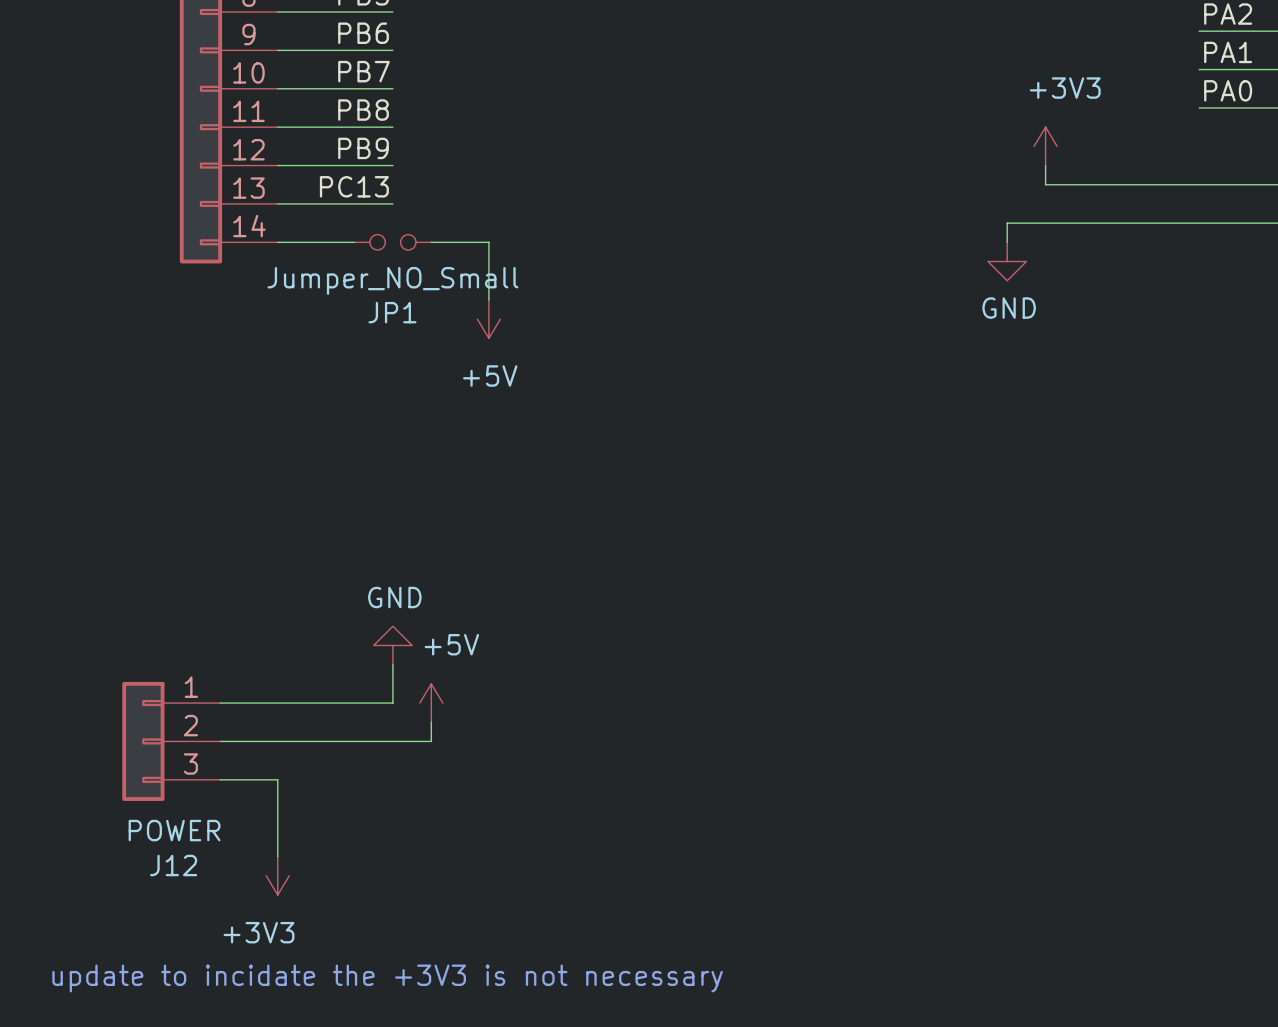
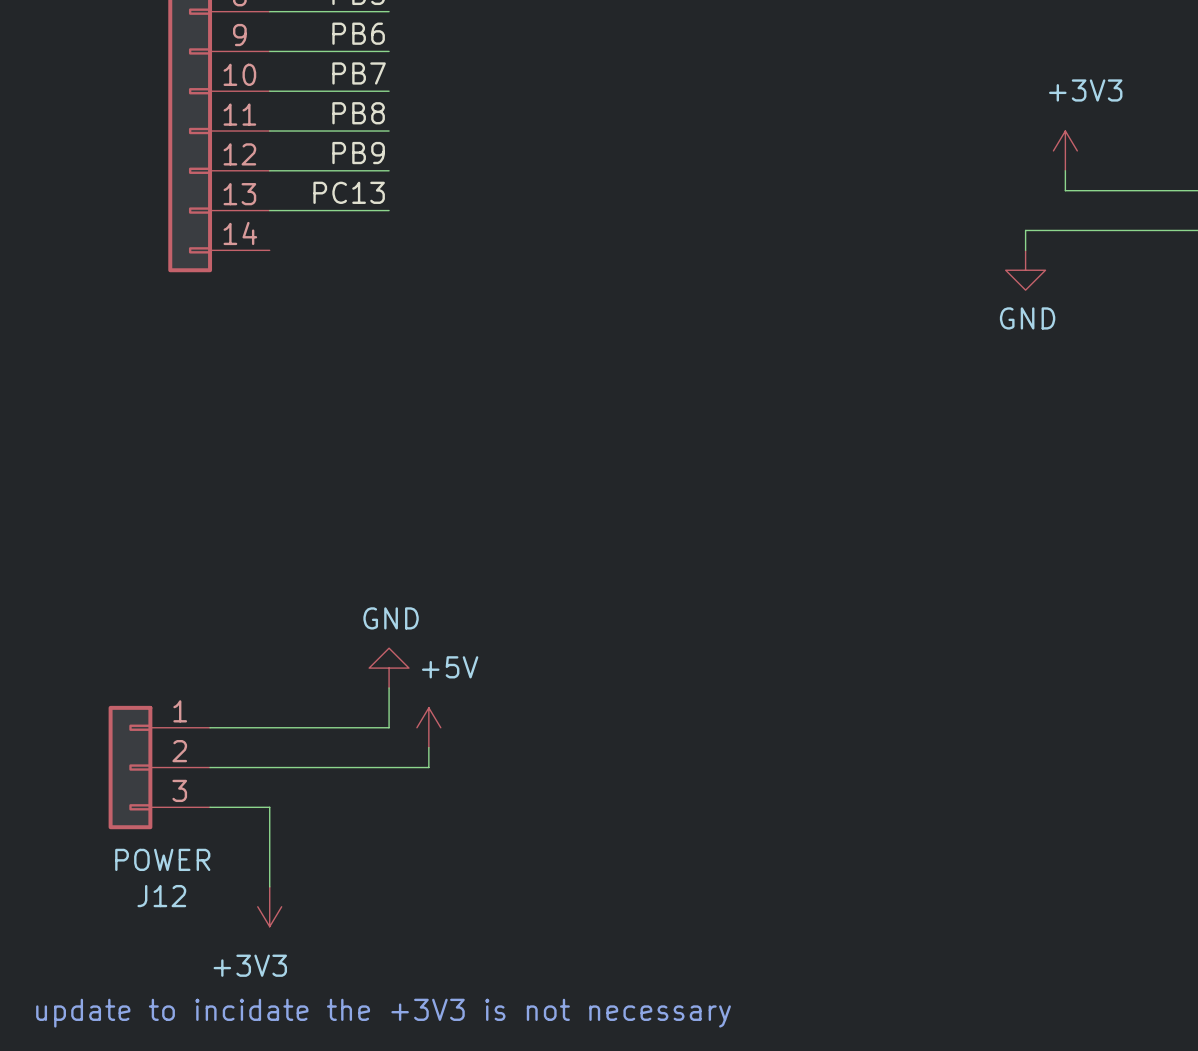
wire: (277, 242) (354, 242) -> none
JP1: Jumper_NO_Small (392, 242) -> none
wire: (431, 242) (488, 242) (488, 299) -> none
power symbol: +5V (488, 319) -> none

